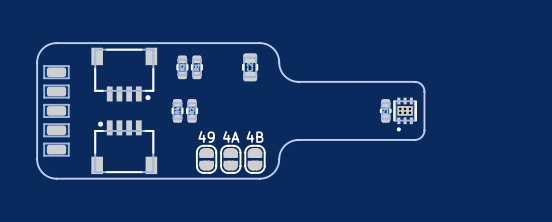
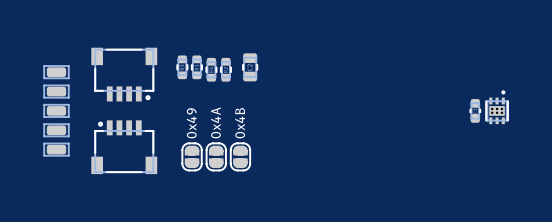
board edge: (56, 43) (264, 43) (276, 52) (283, 74) (294, 81) (419, 83) (424, 90) (424, 132) (420, 137) (415, 139) (294, 140) (282, 149) (274, 171) (262, 178) (52, 178) (42, 173) (37, 161) (37, 62) (42, 48) (56, 43) -> none
part position: (177, 110) -> (211, 69)
part position: (192, 110) -> (225, 69)
part position: (385, 110) -> (475, 110)
part rotation: 0° (405, 114) -> 180° (497, 107)
part position: (405, 114) -> (497, 107)
part: none -> 0x49 (192, 156)
part: none -> 0x4A (216, 156)
part: none -> 0x4B (240, 156)
part: 49 (206, 159) -> none
part: 4A (230, 159) -> none
part: 4B (254, 159) -> none

